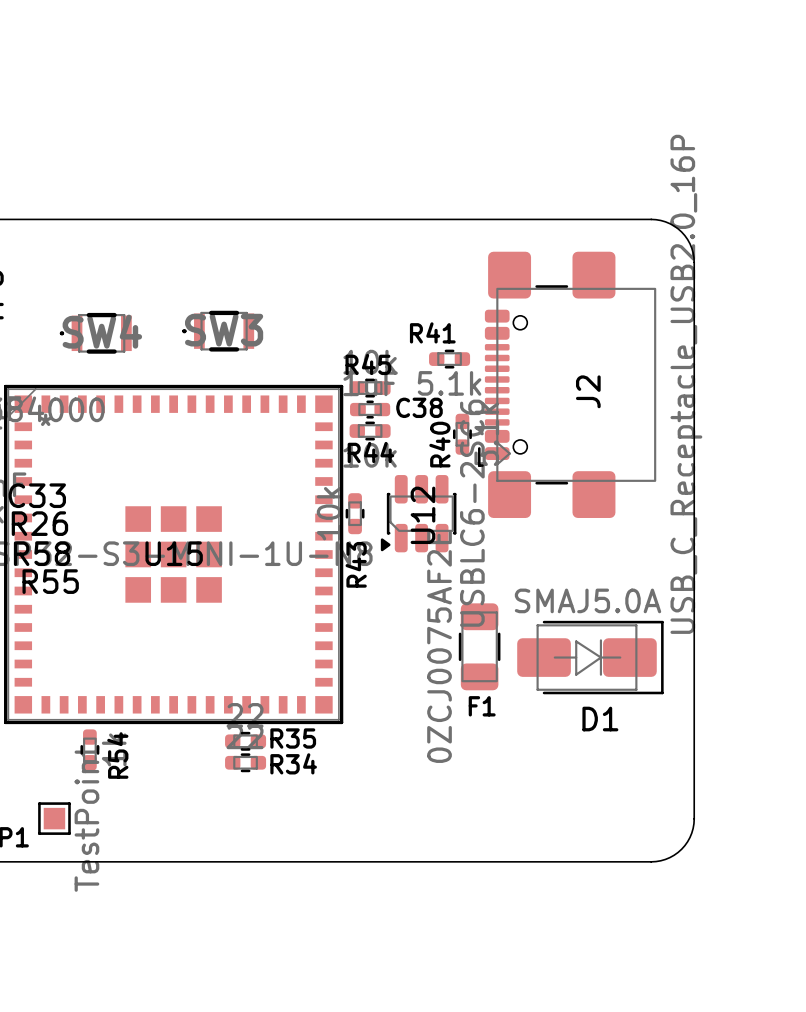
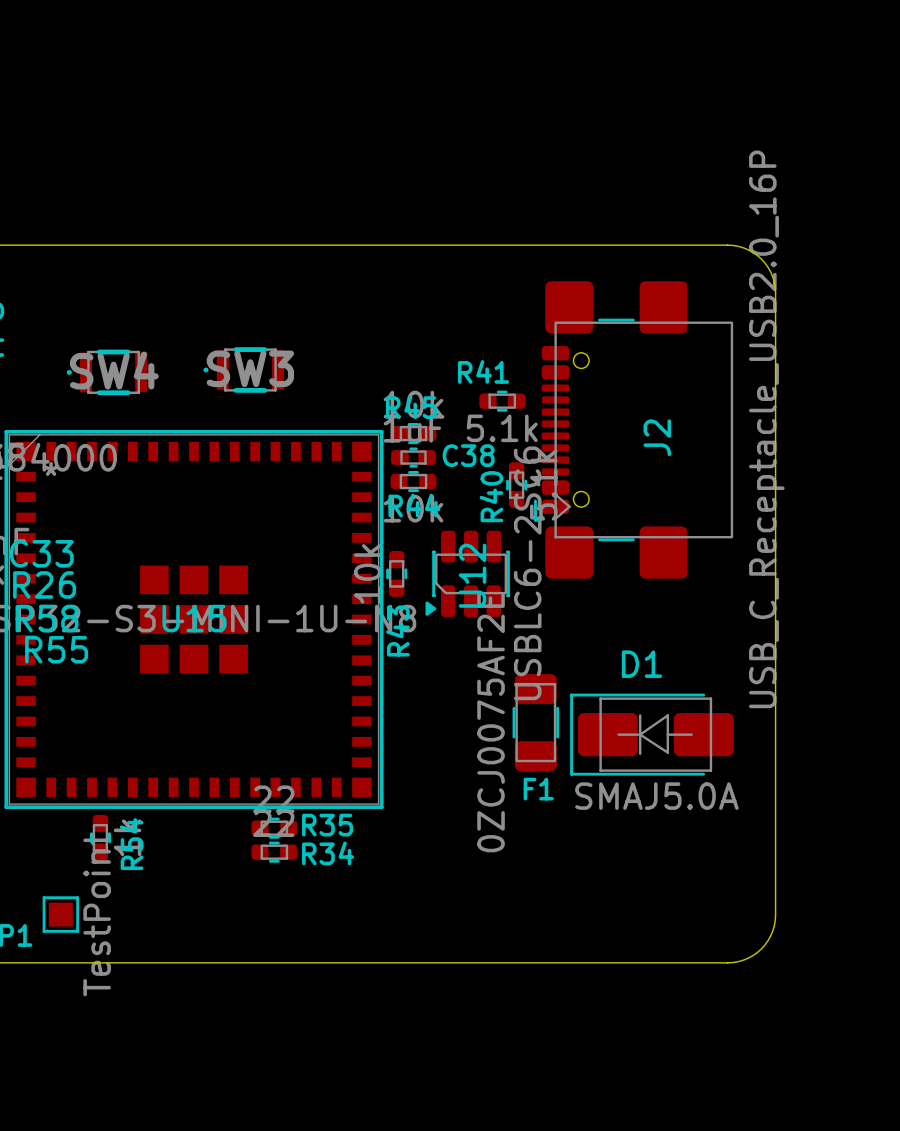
D1 rotation: 0° (590, 657) -> 180° (651, 734)

